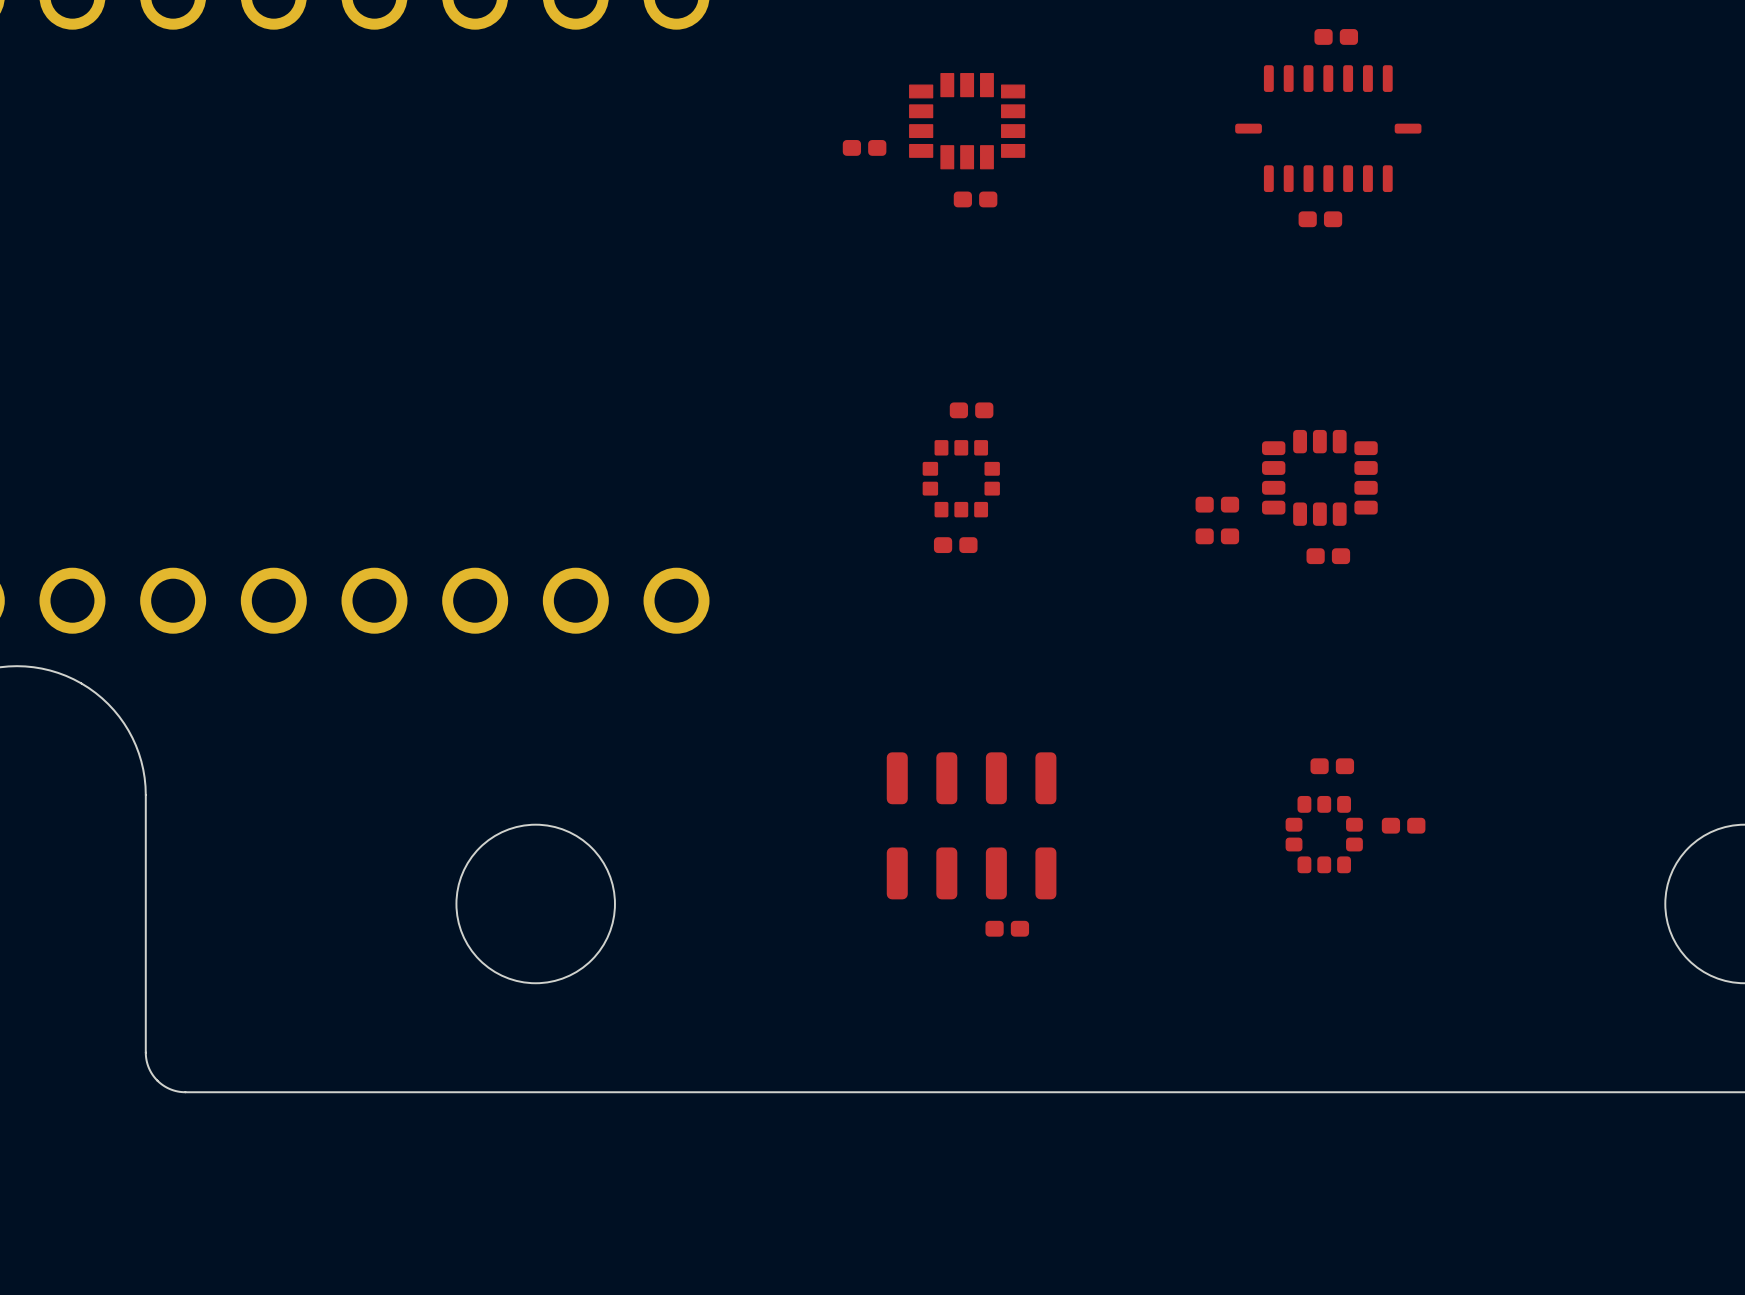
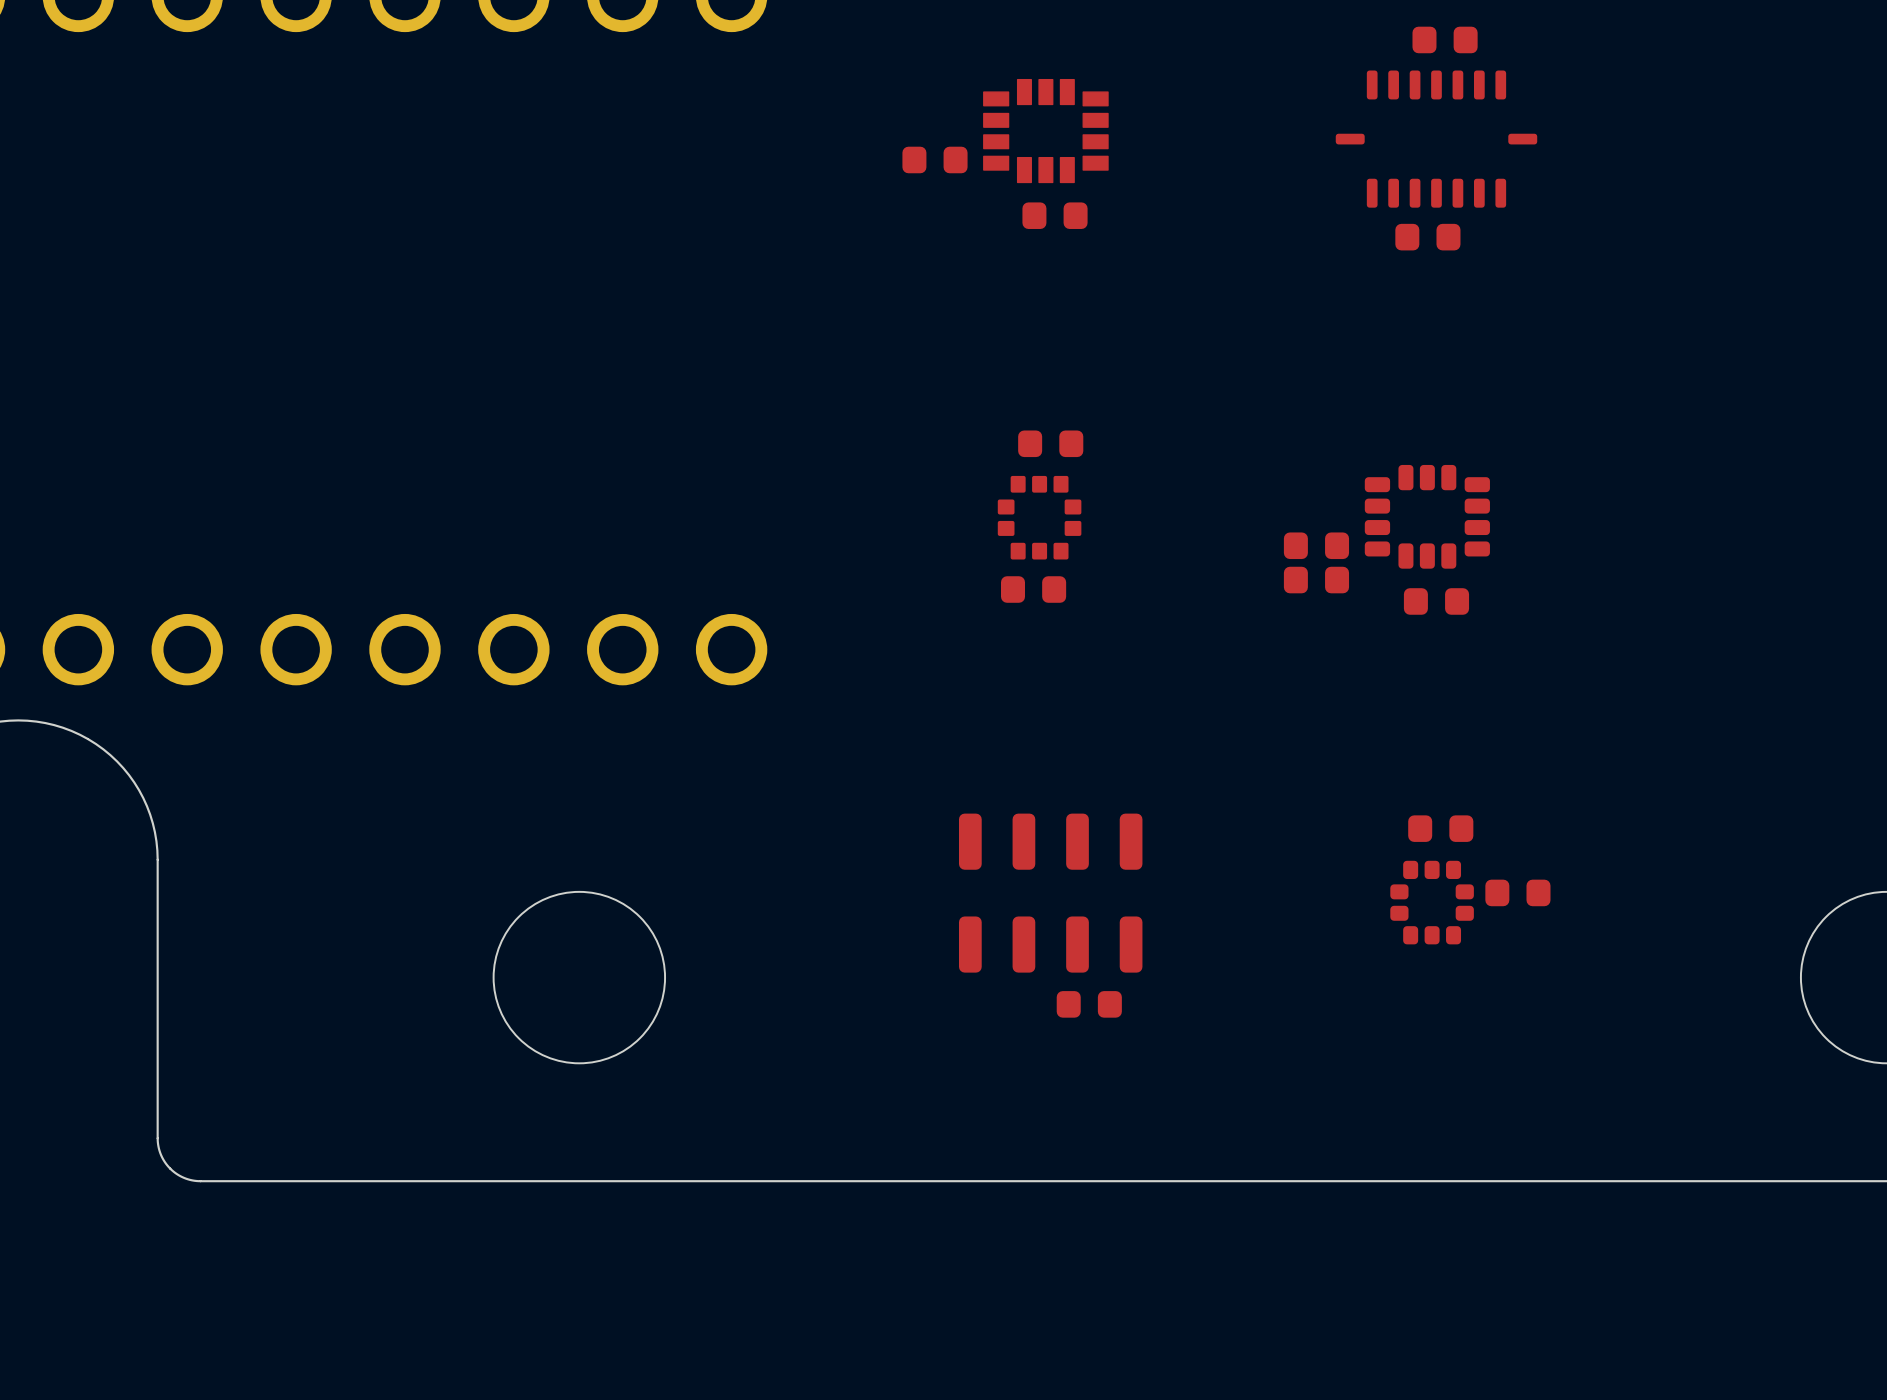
part footprint: [1314, 29, 1359, 45] -> [1412, 26, 1478, 54]
part footprint: [842, 140, 887, 156] -> [902, 146, 968, 174]
part footprint: [953, 191, 998, 208] -> [1022, 202, 1088, 229]
part footprint: [1298, 211, 1343, 228] -> [1395, 223, 1461, 251]
part footprint: [949, 402, 994, 419] -> [1018, 430, 1084, 458]
part footprint: [1195, 496, 1240, 513] -> [1283, 532, 1350, 560]
part footprint: [1195, 528, 1240, 545] -> [1283, 566, 1350, 594]
part footprint: [933, 537, 978, 554] -> [1001, 576, 1067, 603]
part footprint: [1306, 548, 1351, 565] -> [1403, 588, 1470, 615]
part footprint: [1310, 758, 1355, 775] -> [1408, 815, 1474, 842]
part footprint: [1381, 817, 1426, 834] -> [1485, 879, 1551, 907]
part footprint: [985, 920, 1030, 937] -> [1056, 991, 1122, 1018]

